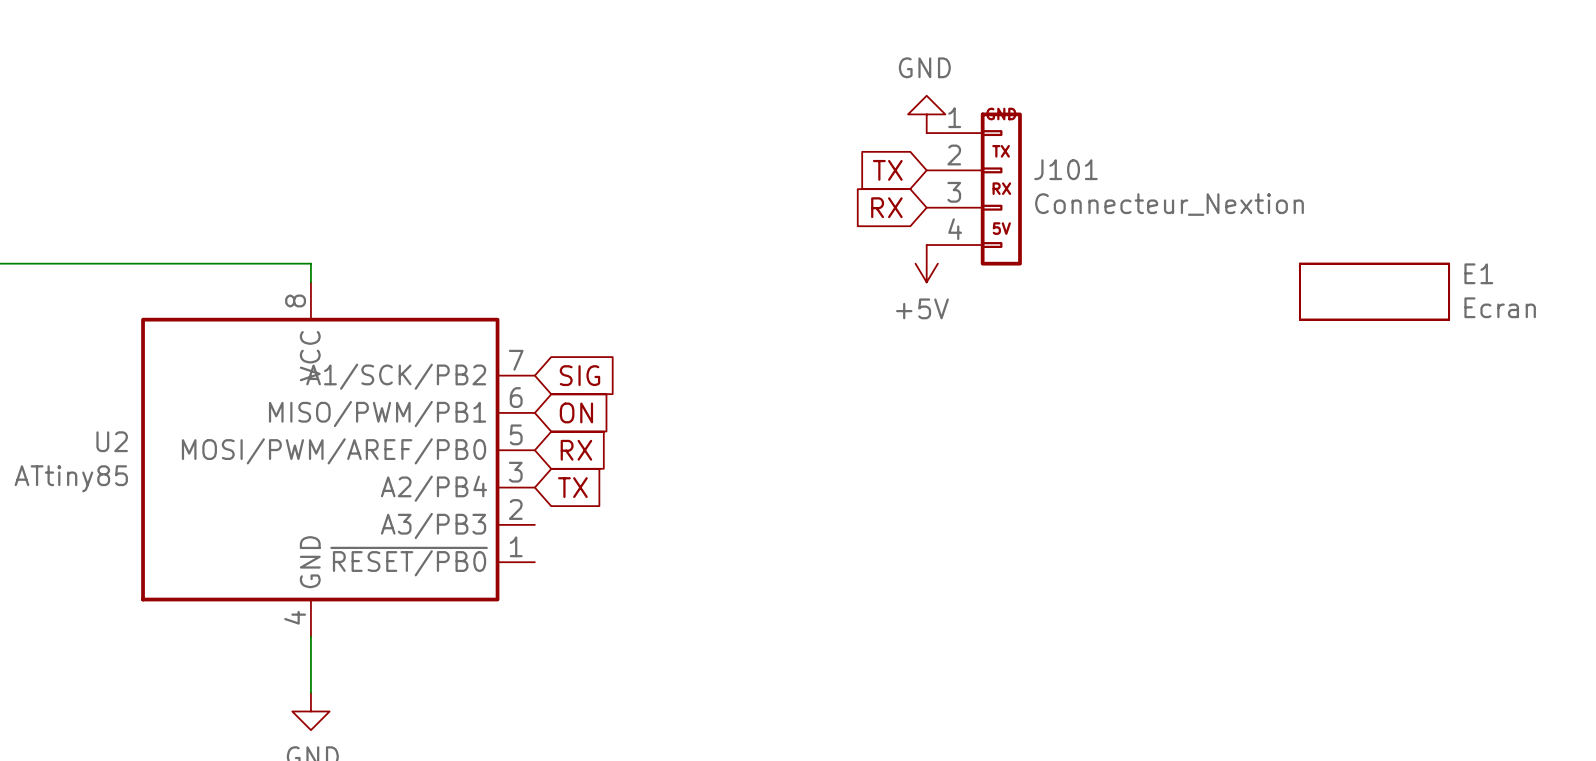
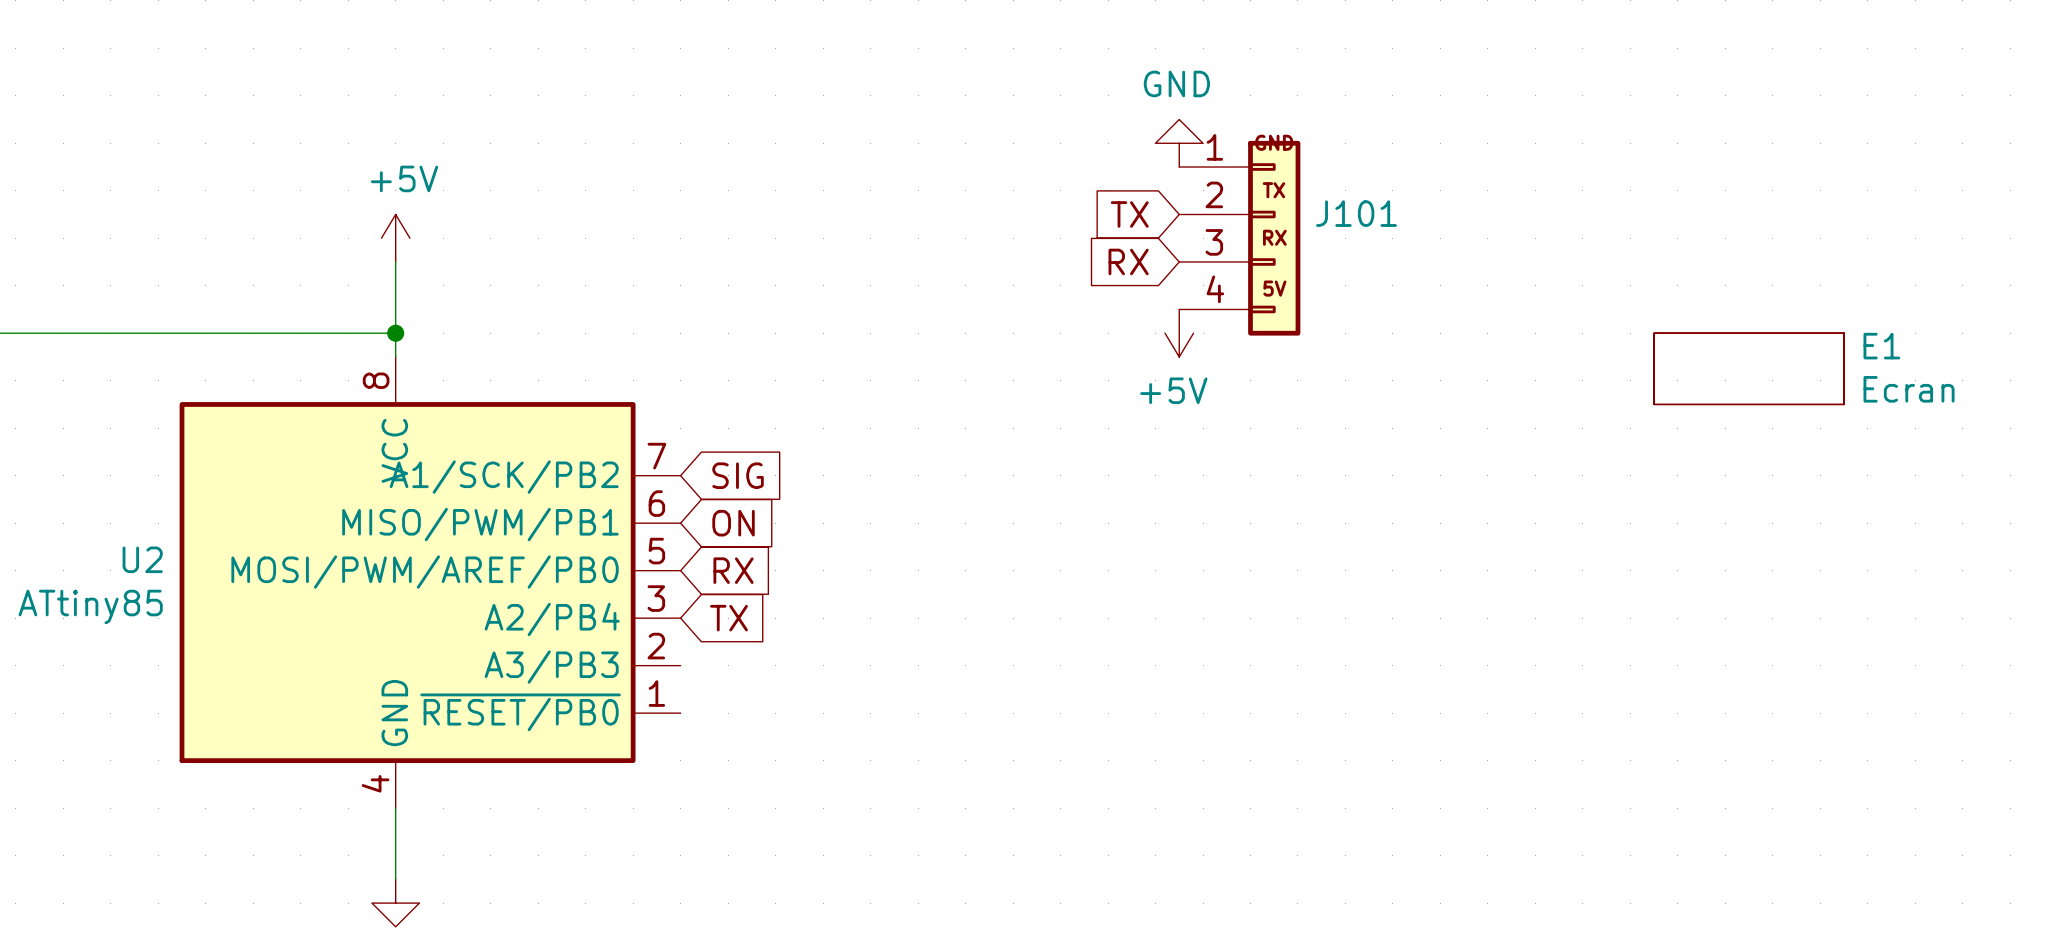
power symbol: none -> +5V (395, 238)
J101 value: Connecteur_Nextion (1169, 204) -> none
wire: none -> (395, 261) (395, 333)
junction: none -> (395, 333)

